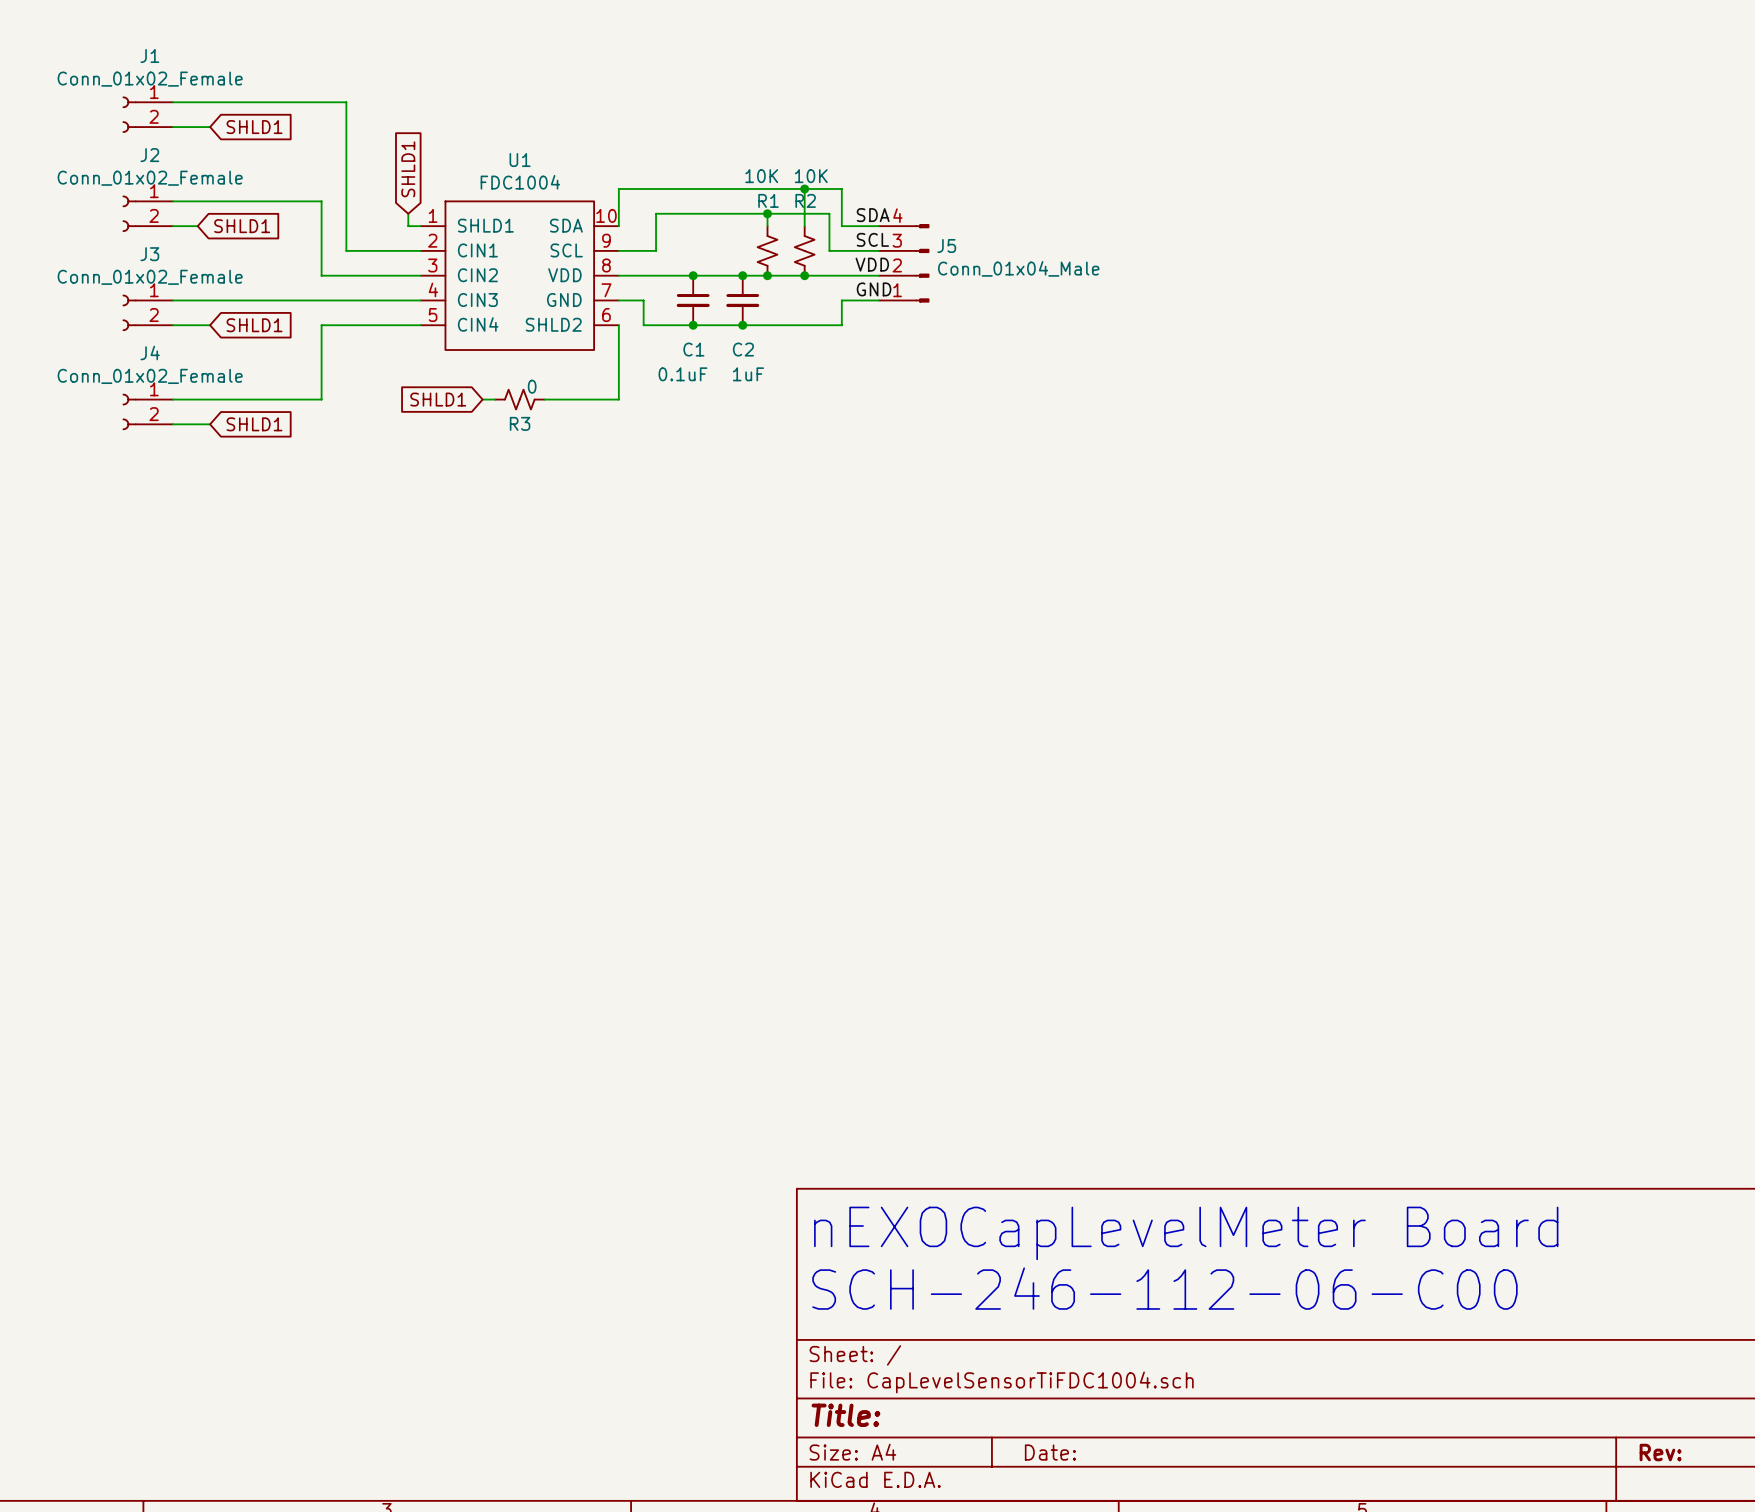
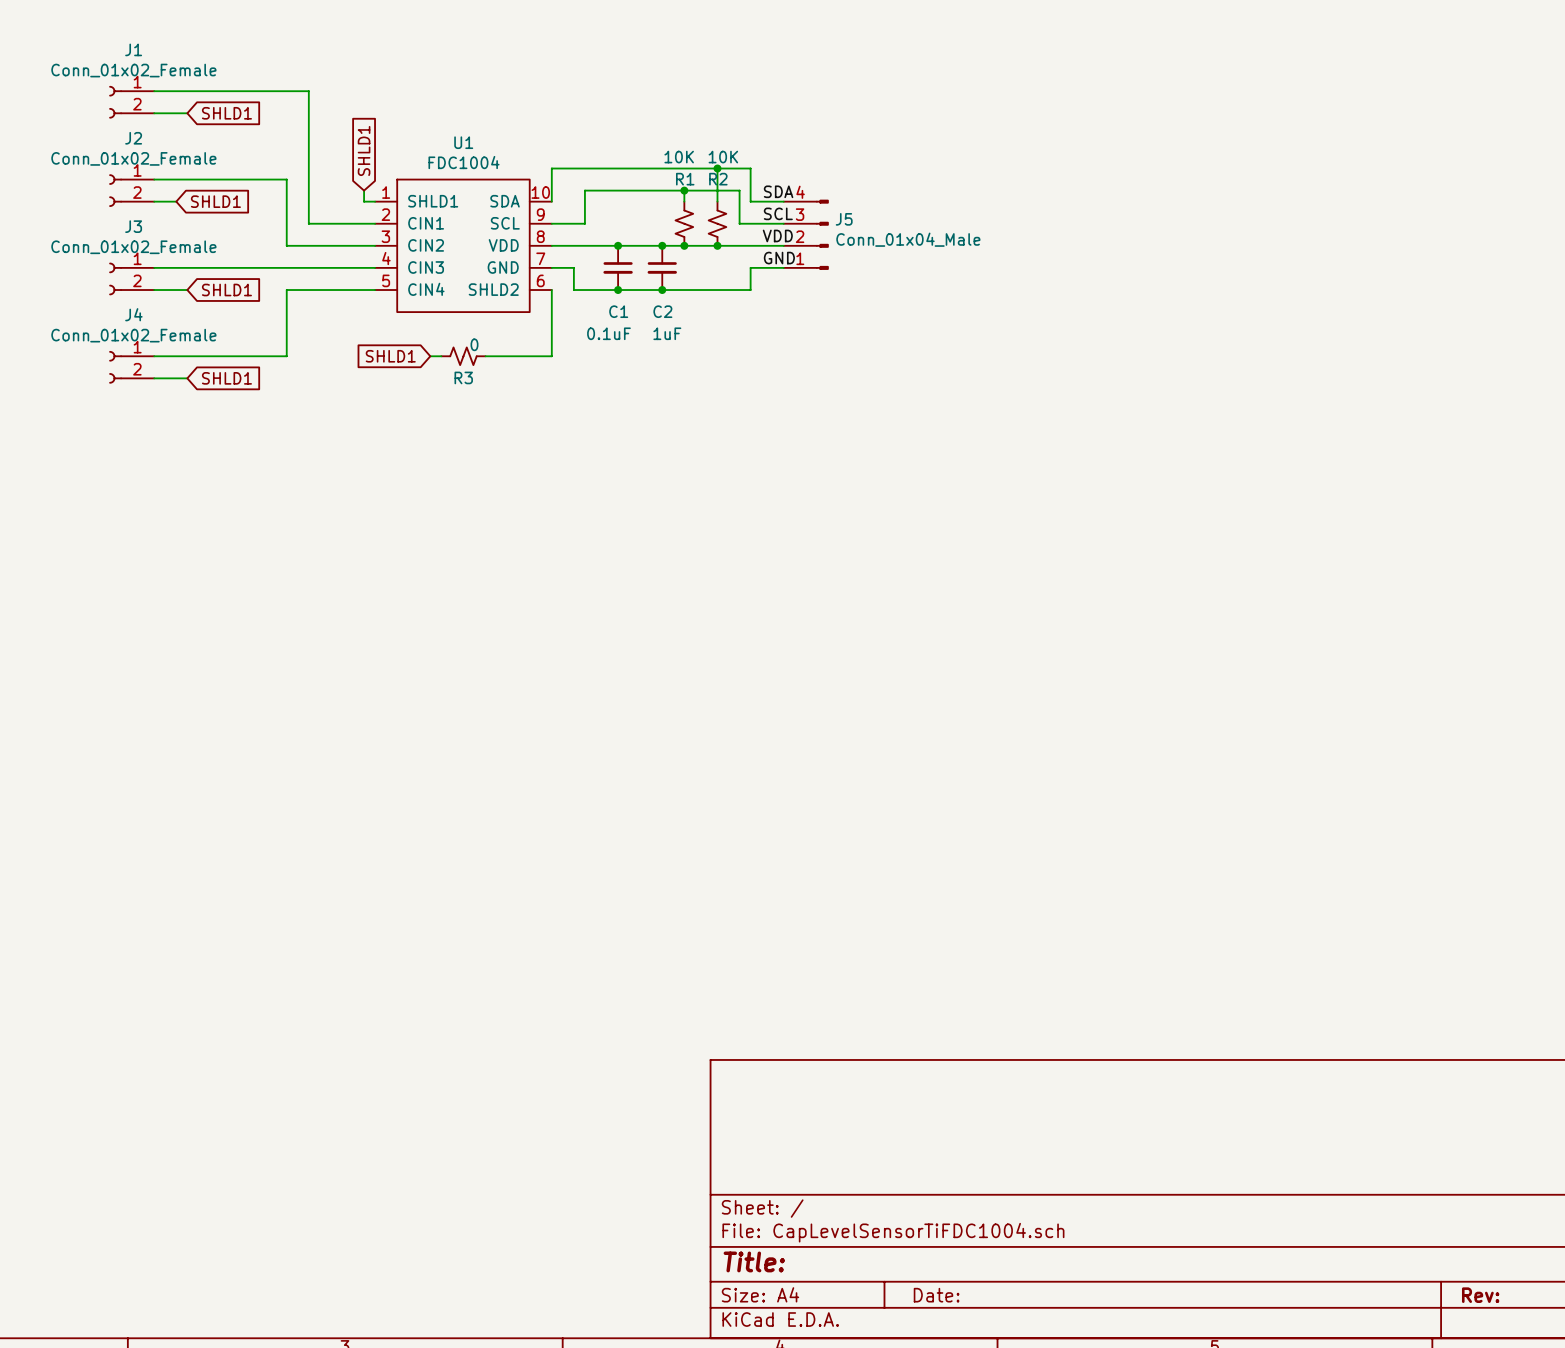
text: nEXOCapLevelMeter Board (1186, 1233) -> none
text: SCH-246-112-06-C00 (1164, 1288) -> none

